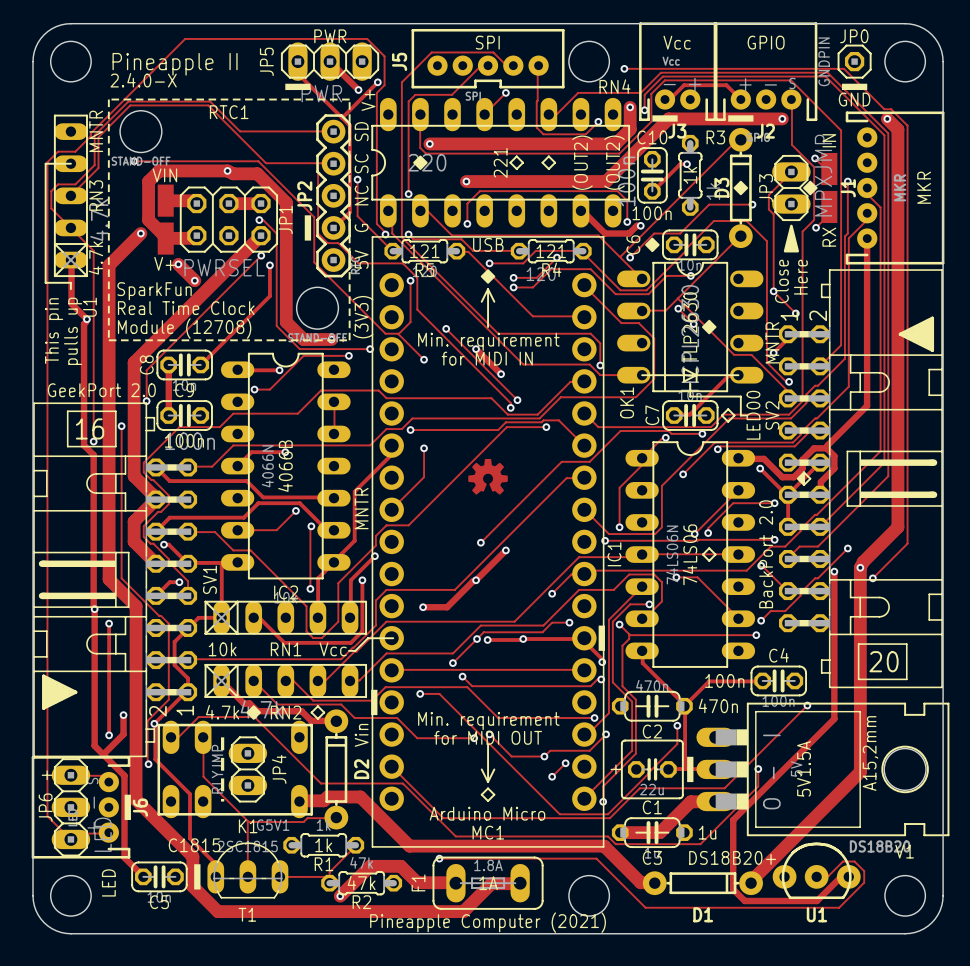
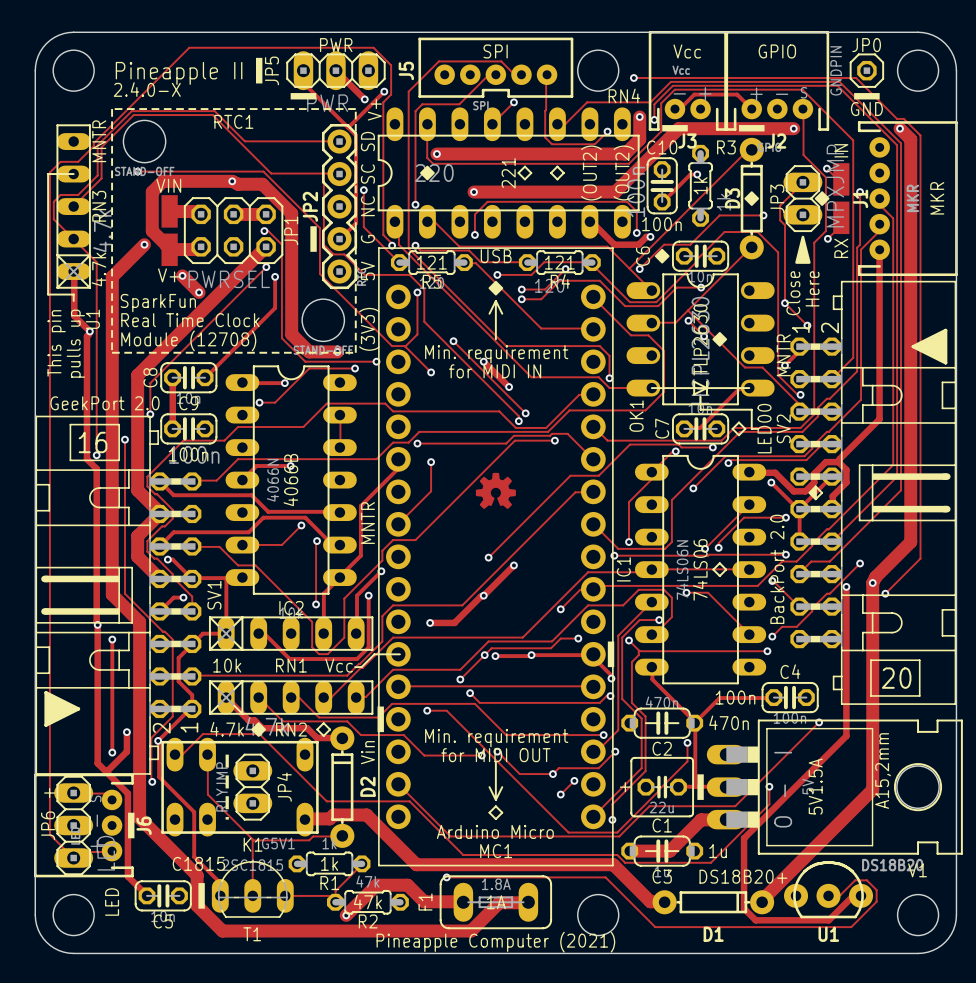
drawing: none -> [255, 57, 263, 84]

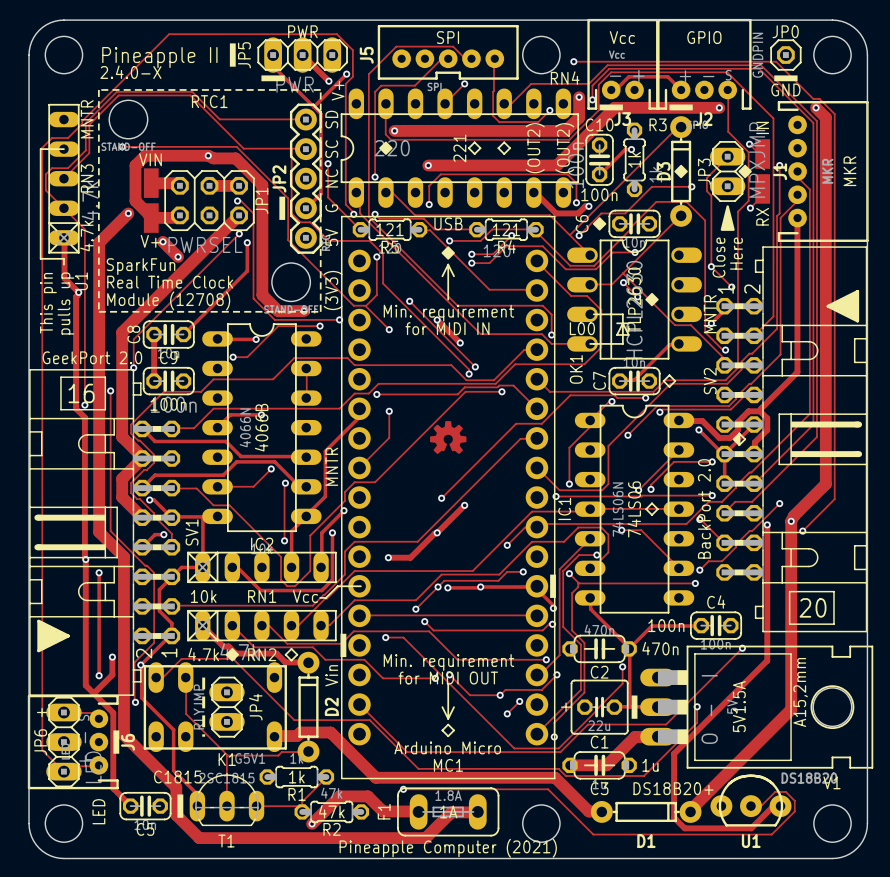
line: none -> (617, 323) (628, 323)
line: none -> (622, 323) (617, 334) (628, 334) (622, 323)
text: none -> L00 (582, 328)
line: (694, 381) (694, 394) (706, 388) (694, 381) -> none
line: (706, 381) (706, 394) -> none
line: (687, 388) (749, 388) -> (622, 343) (622, 314) (593, 314)
line: (700, 396) (700, 409) (751, 409) (751, 428) (758, 428) -> none
text: LED00 (764, 428) -> none

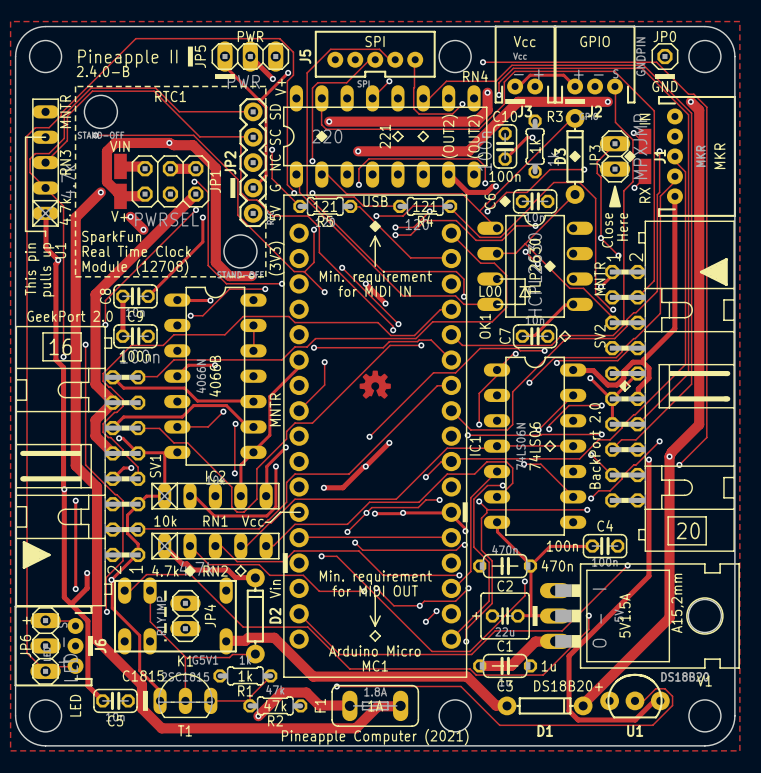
zone outline: none -> (10, 21) (739, 21) (739, 750) (10, 750) (10, 21)
text: 2.4.0-X (130, 72) -> 2.4.0-B (103, 71)

